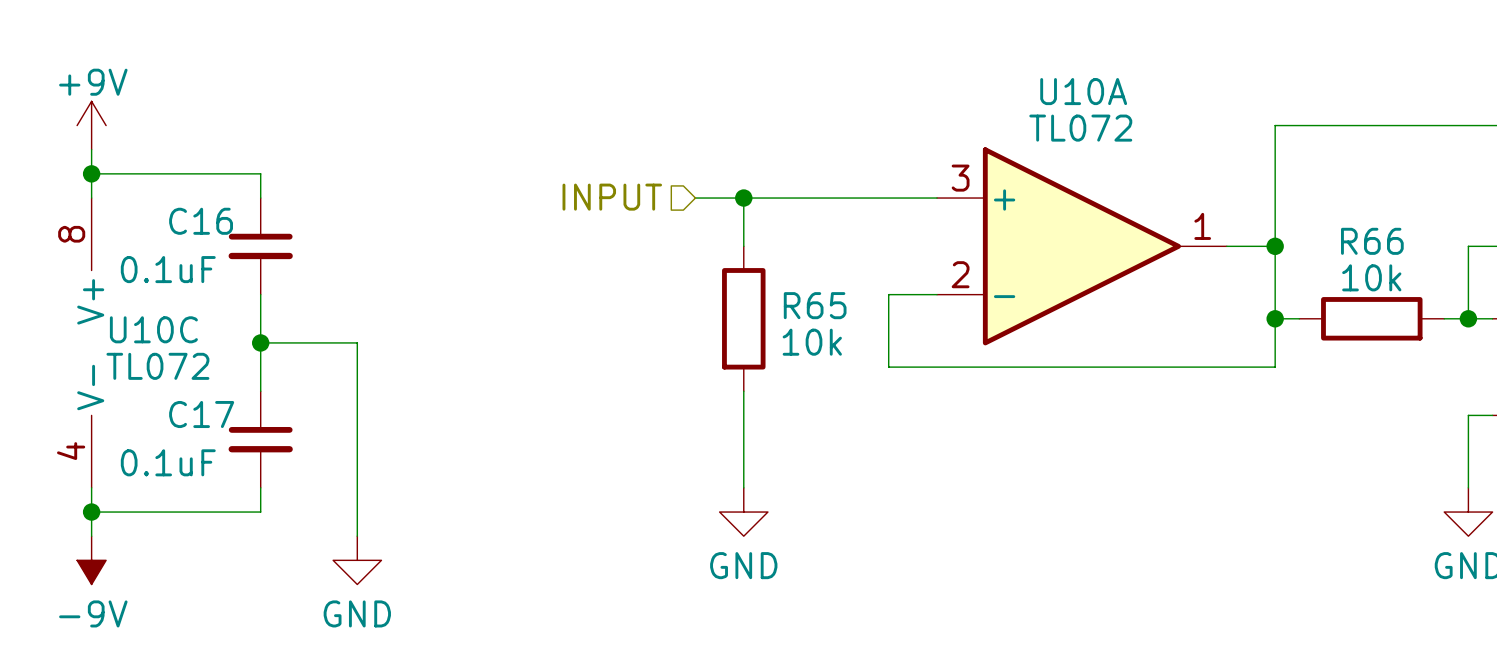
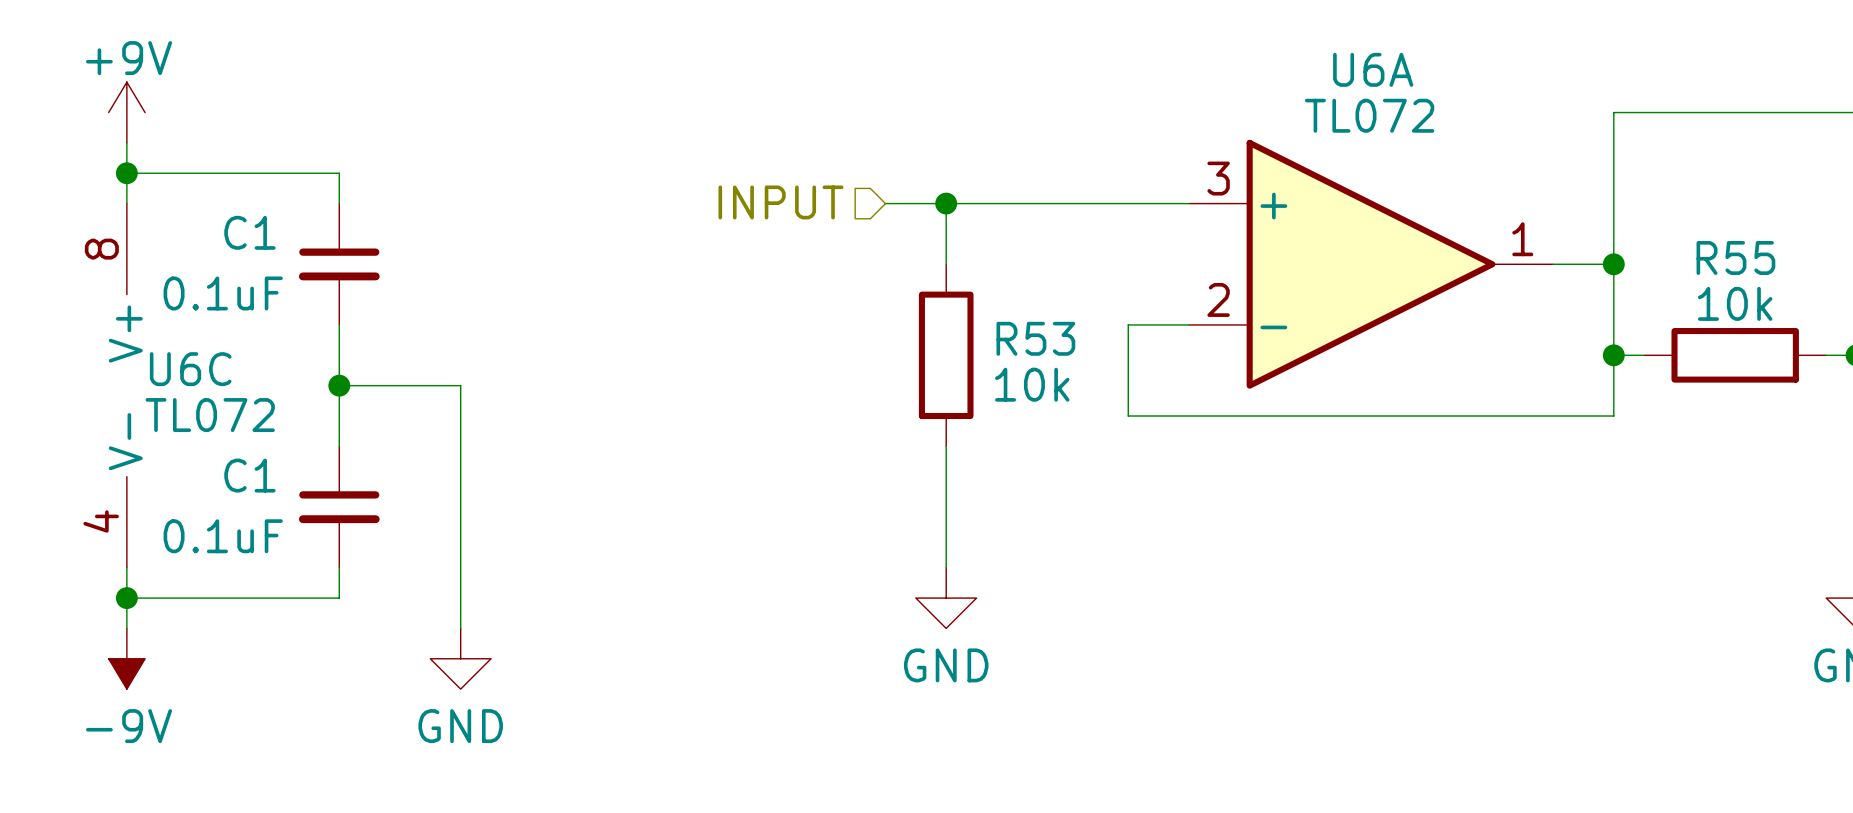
U10A name: U10A (1083, 91) -> U6A (1373, 69)
C16 name: C16 (201, 221) -> C1 (249, 232)
R66 name: R66 (1372, 241) -> R55 (1735, 257)
R65 name: R65 (815, 305) -> R53 (1035, 338)
U10C name: U10C (153, 329) -> U6C (190, 369)
C17 name: C17 (201, 414) -> C1 (249, 475)

